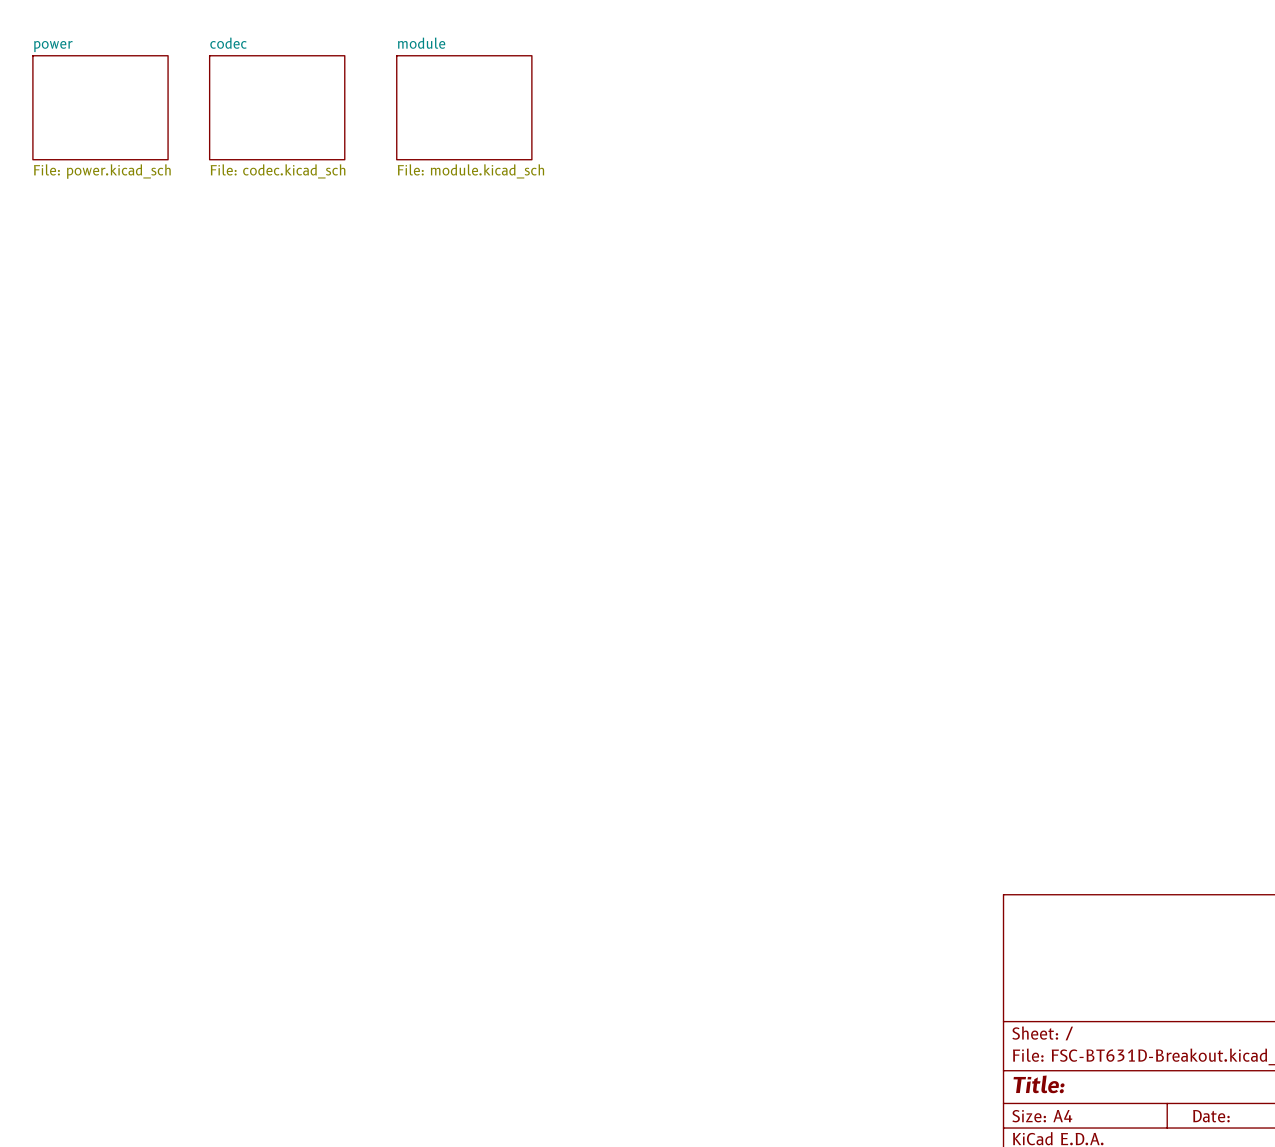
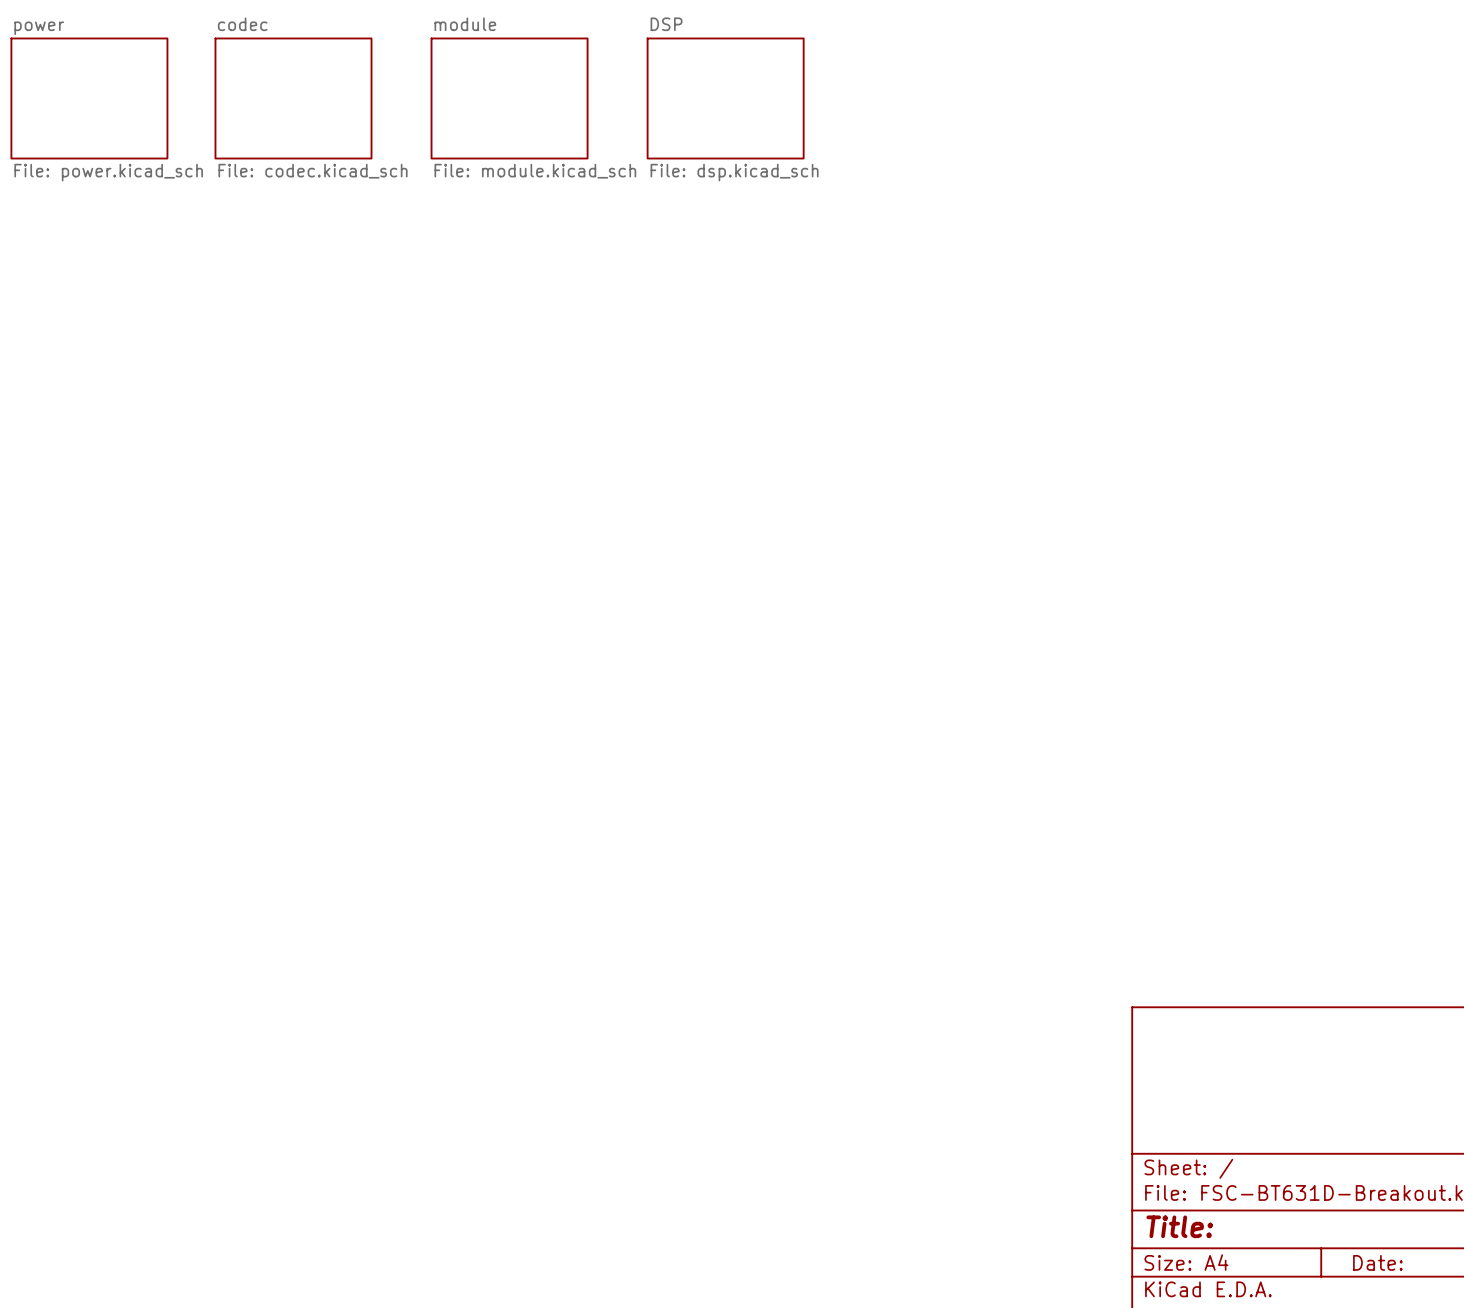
sheet DSP: none -> File: dsp.kicad_sch (725, 98)

